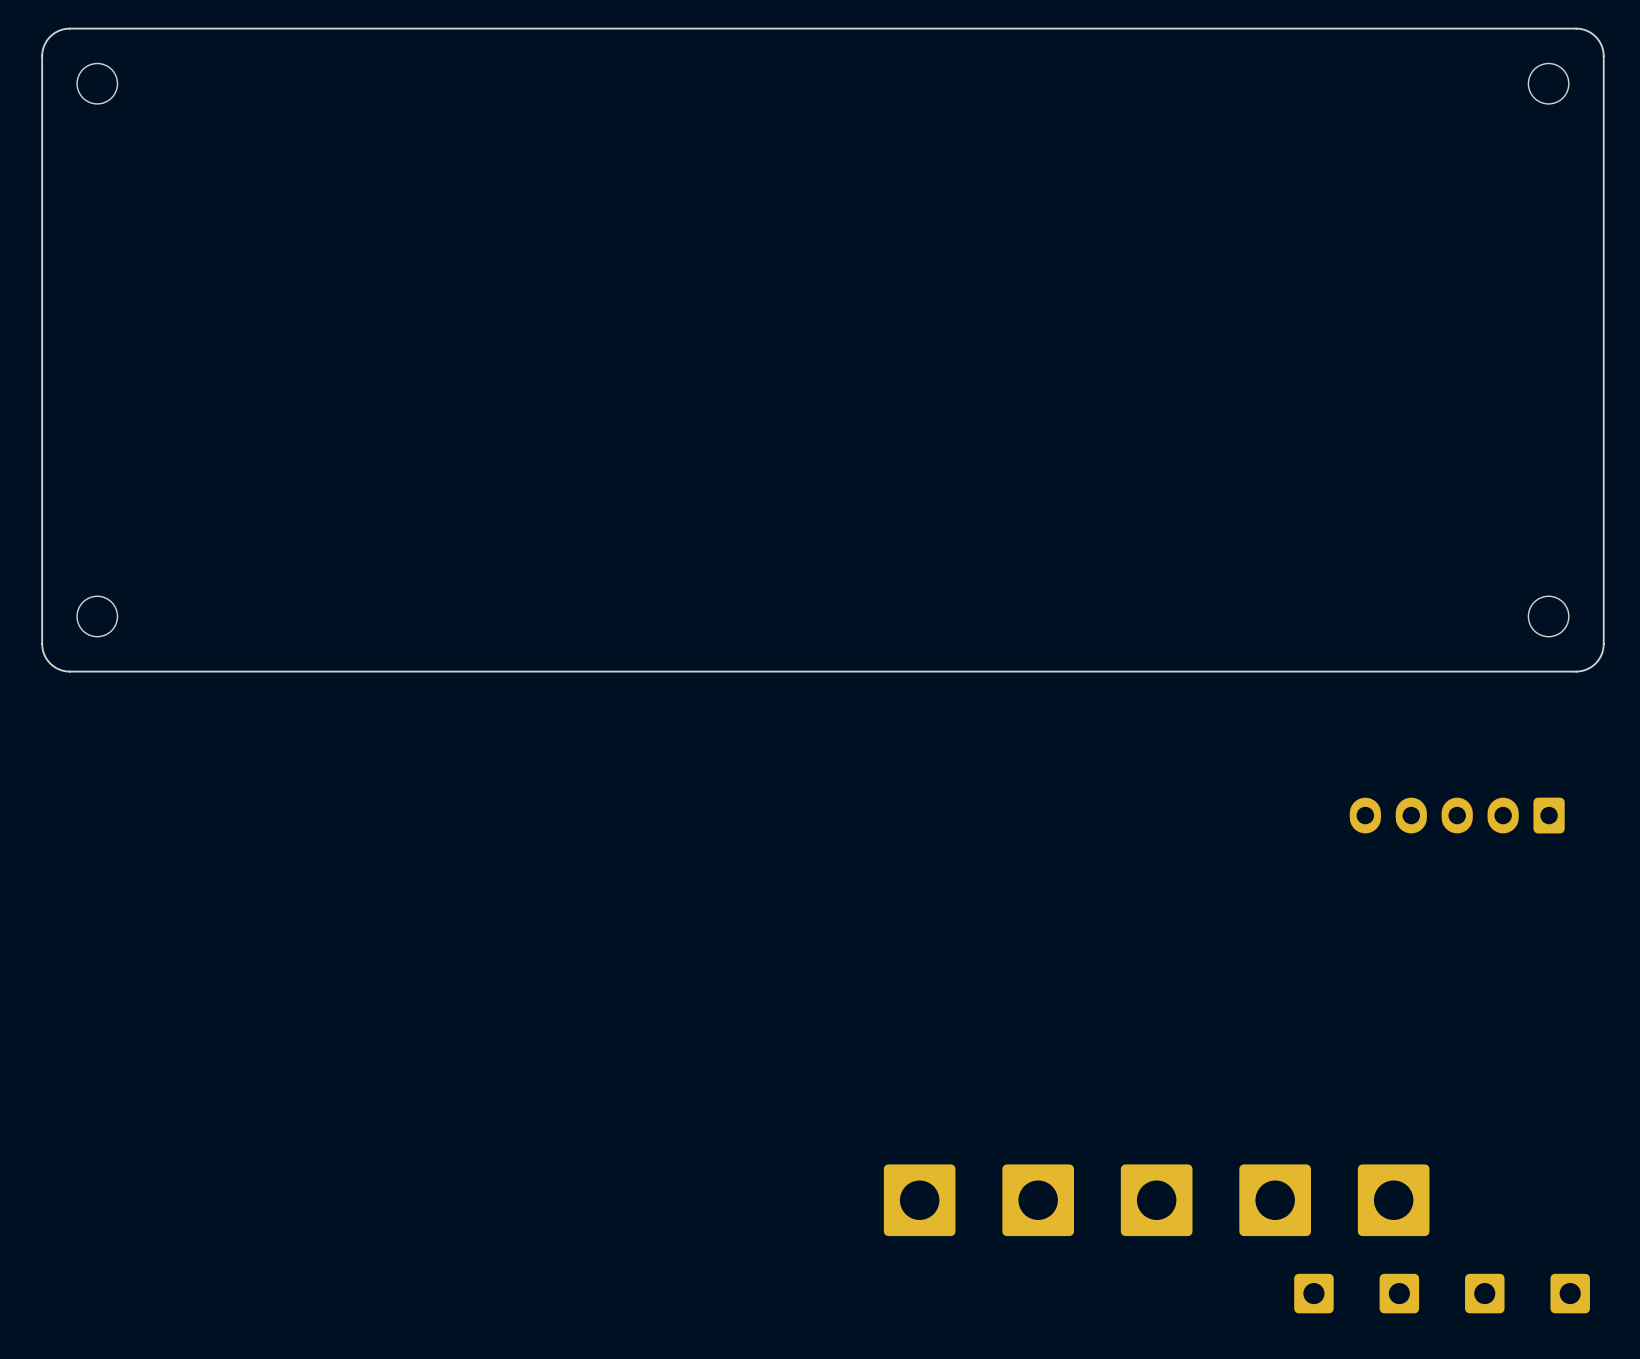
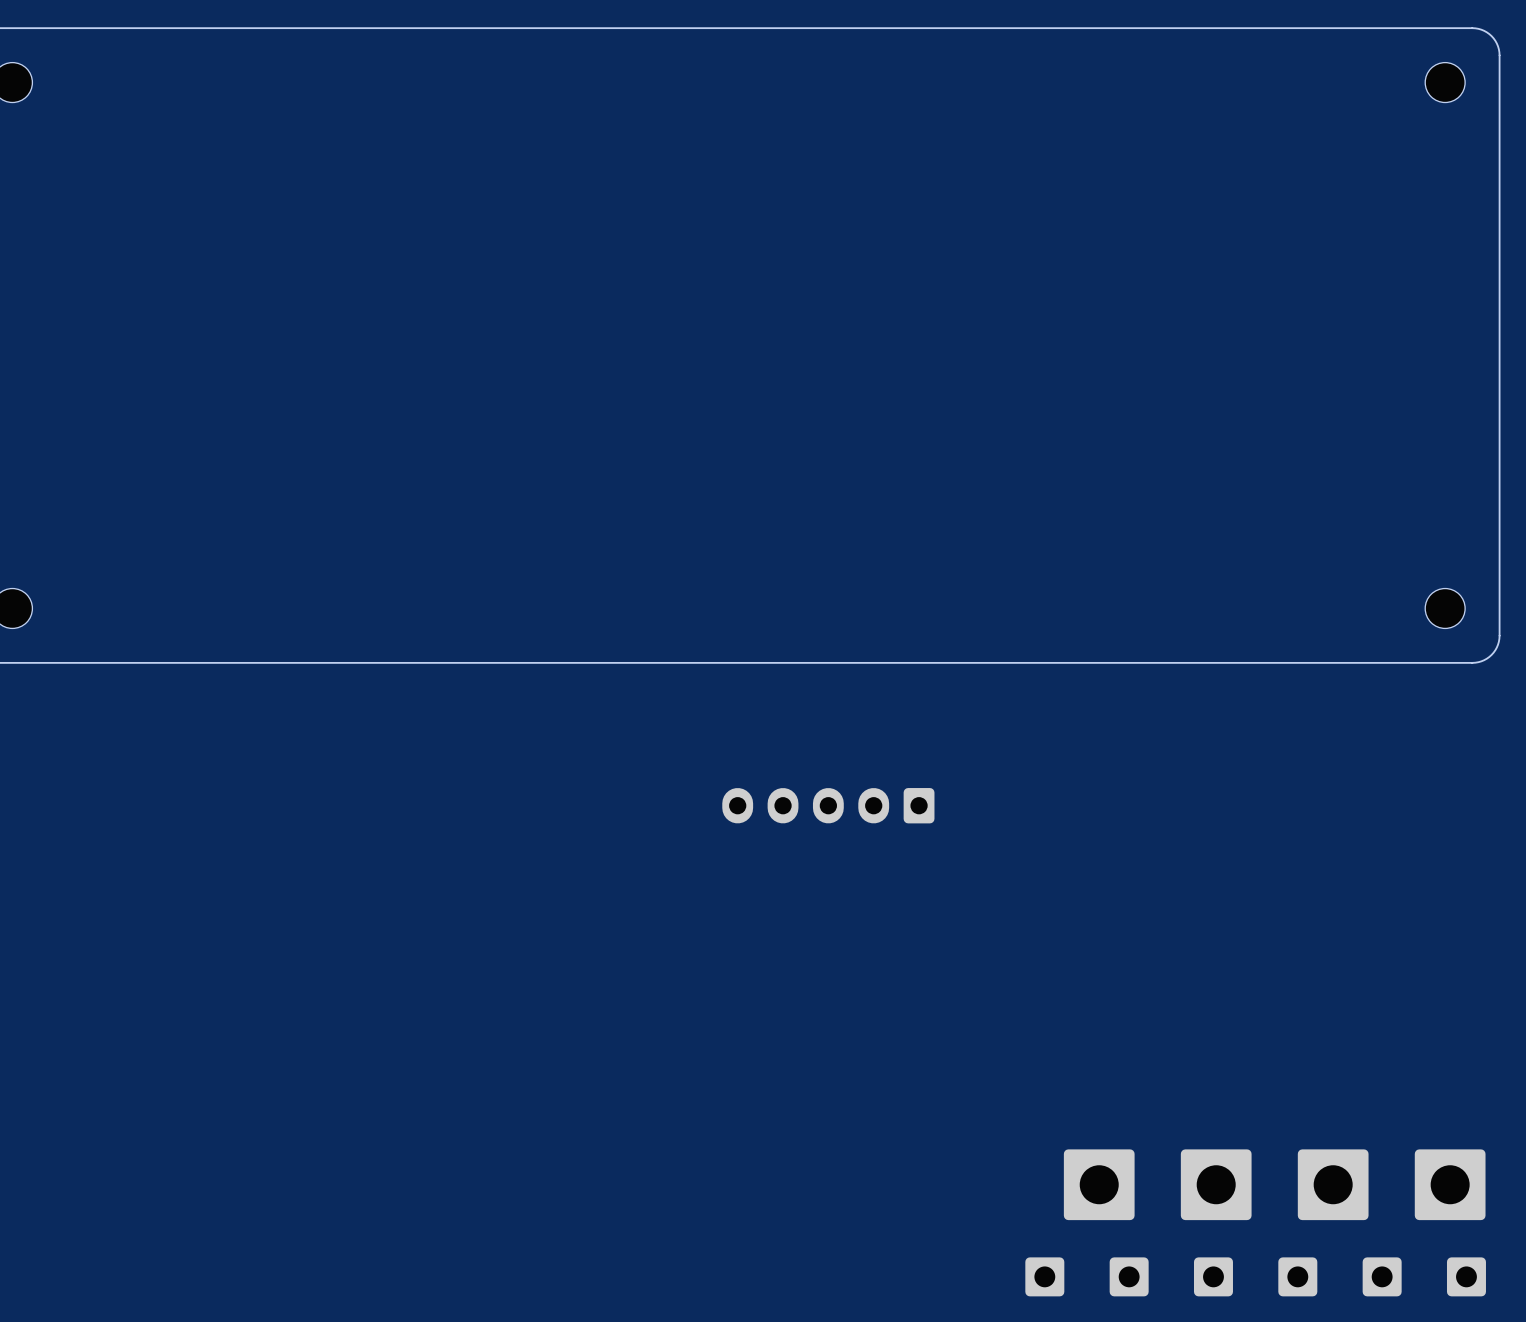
part: (1457, 815) -> none
part: none -> (828, 805)
part: (919, 1200) -> none
part: (1038, 1200) -> none
part: (1156, 1200) -> none
part: none -> (1099, 1184)
part: (1275, 1200) -> none
part: none -> (1216, 1184)
part: (1393, 1200) -> none
part: none -> (1333, 1184)
part: none -> (1450, 1184)
part: none -> (1044, 1276)
part: none -> (1129, 1276)

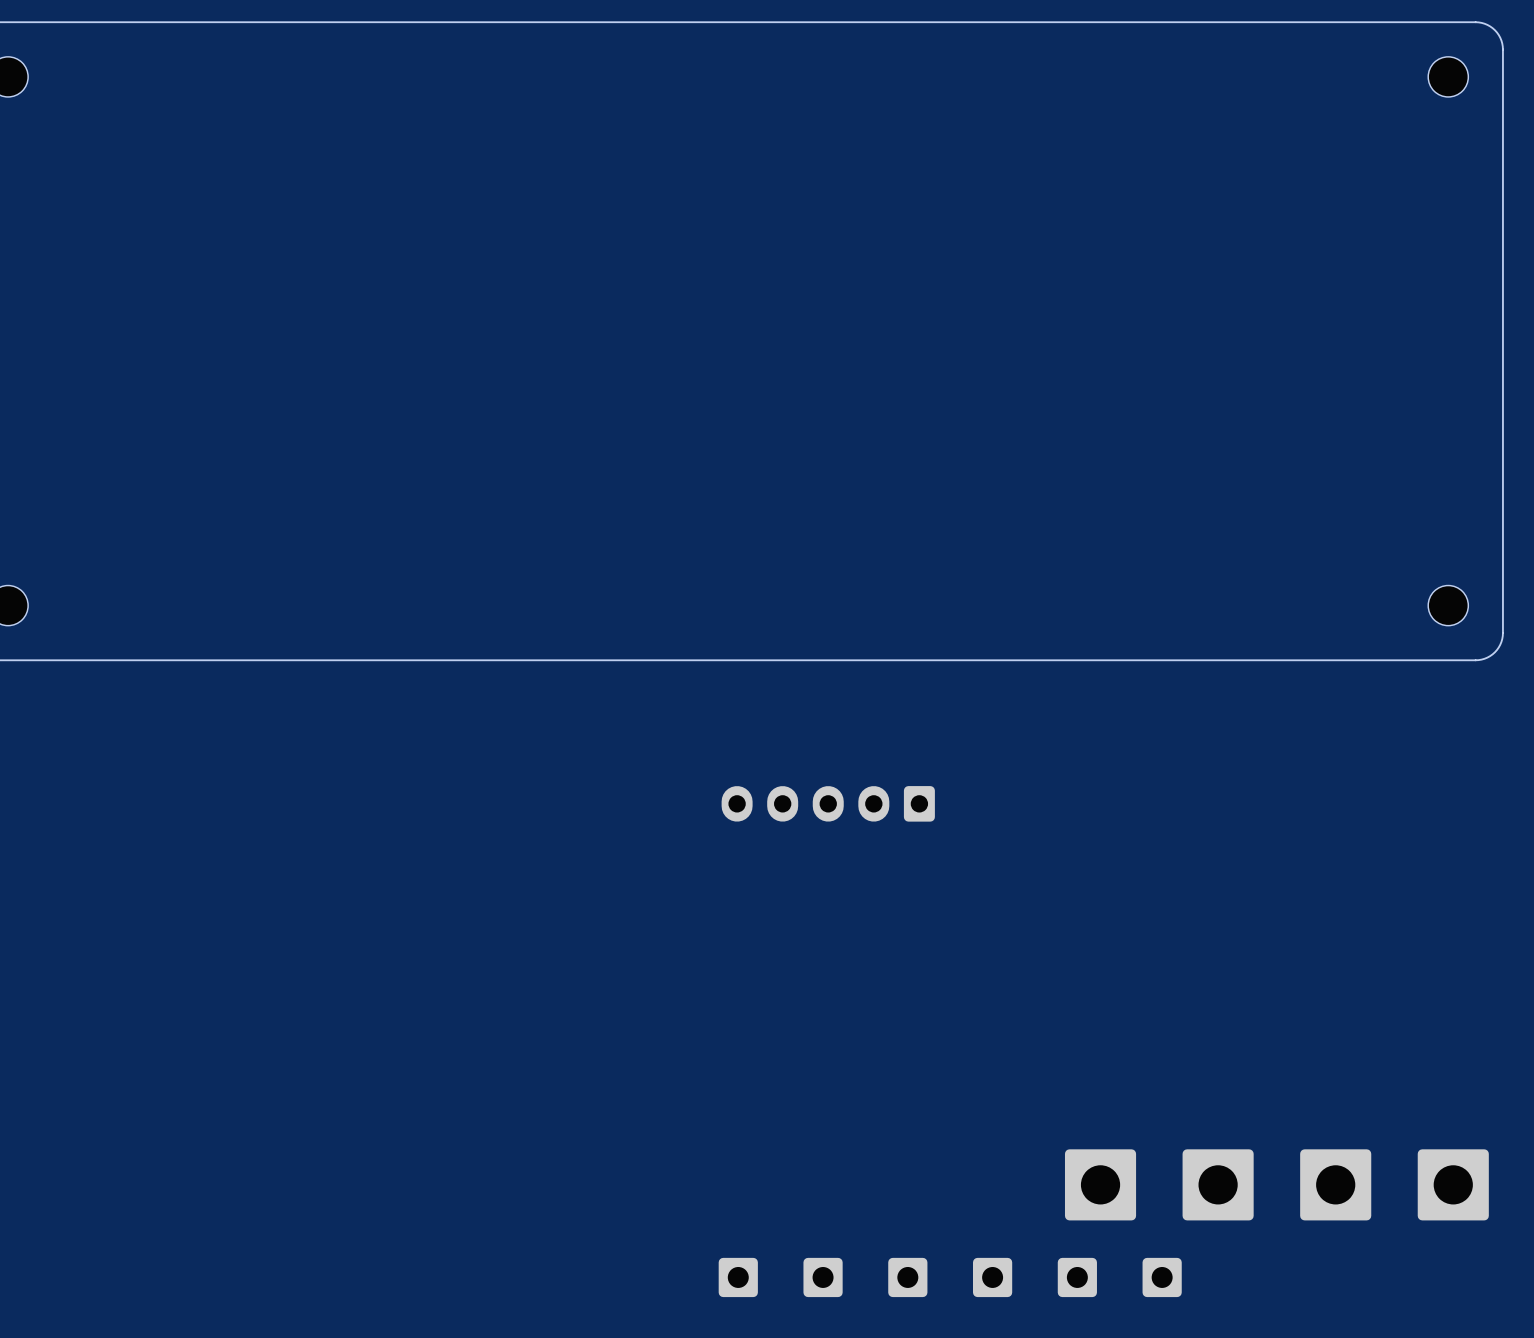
part: none -> (738, 1277)
part: none -> (823, 1277)
part: none -> (907, 1277)
part: none -> (992, 1277)
part: (1044, 1276) -> none
part: none -> (1077, 1277)
part: (1129, 1276) -> none
part: none -> (1162, 1277)
part: (1213, 1276) -> none
part: (1297, 1276) -> none
part: (1382, 1276) -> none
part: (1466, 1276) -> none

